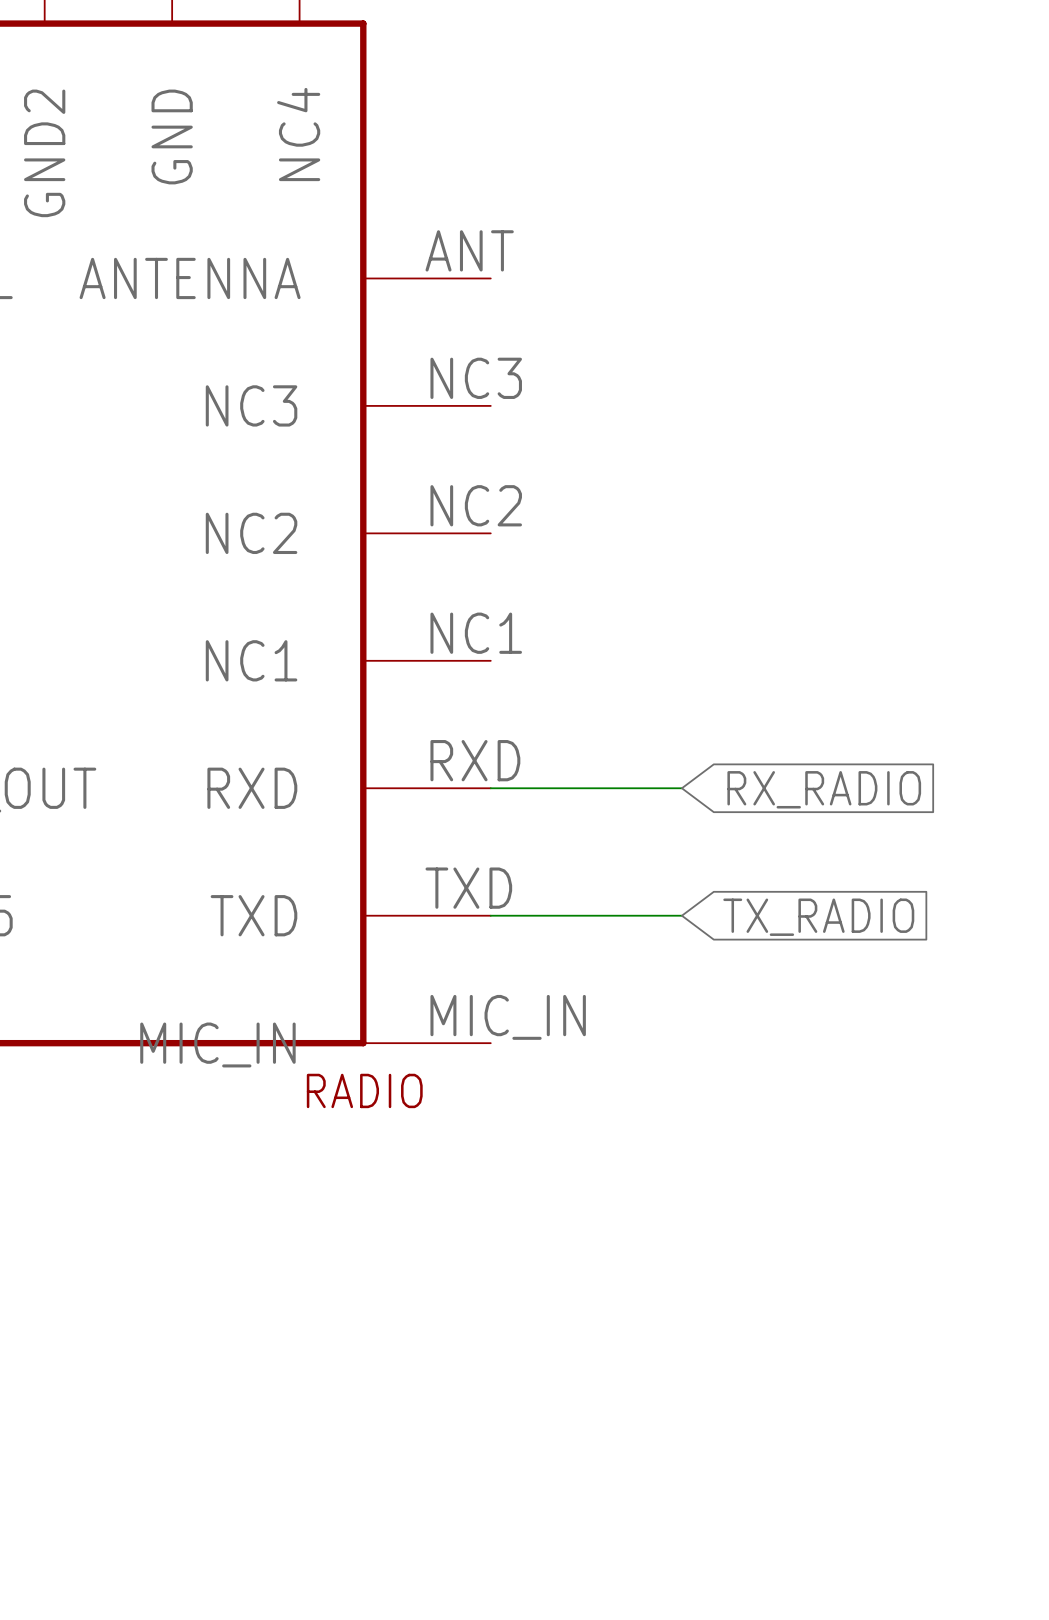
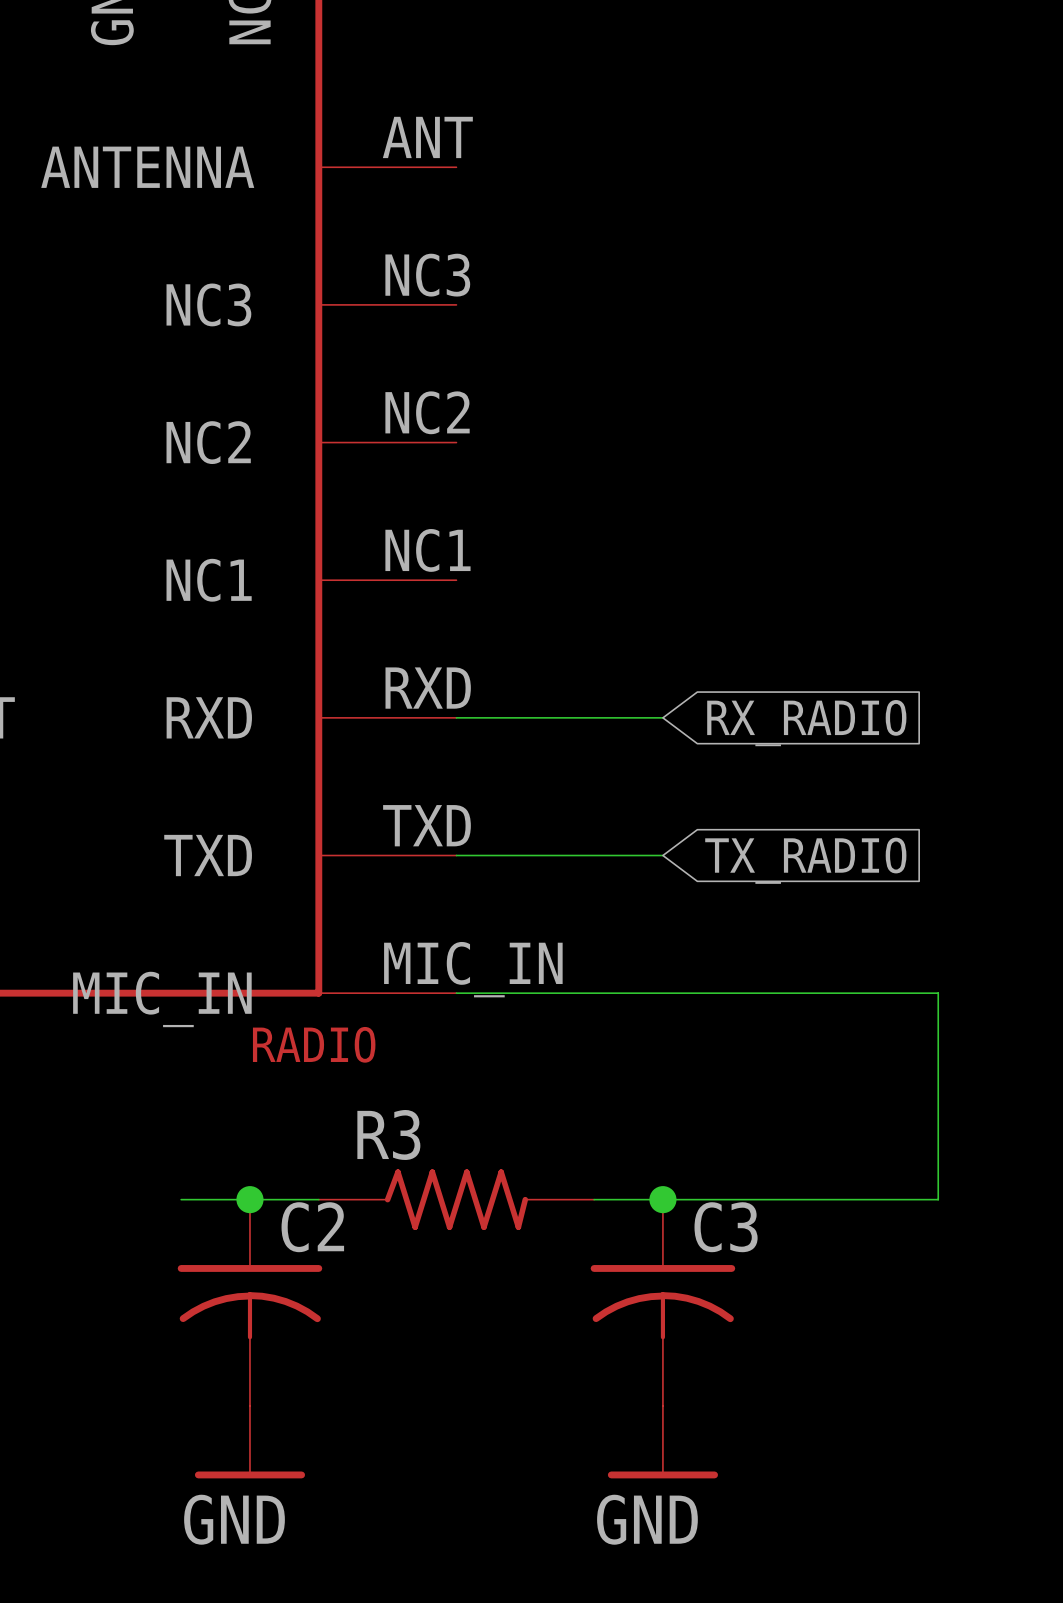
wire: none -> (456, 993) (938, 993) (938, 1199) (594, 1199)
wire: none -> (181, 1199) (318, 1199)
junction: none -> (249, 1199)
R3: none -> (456, 1199)
junction: none -> (662, 1199)
C2: none -> (249, 1302)
C3: none -> (662, 1302)
power symbol: none -> GND (249, 1442)
power symbol: none -> GND (662, 1442)

